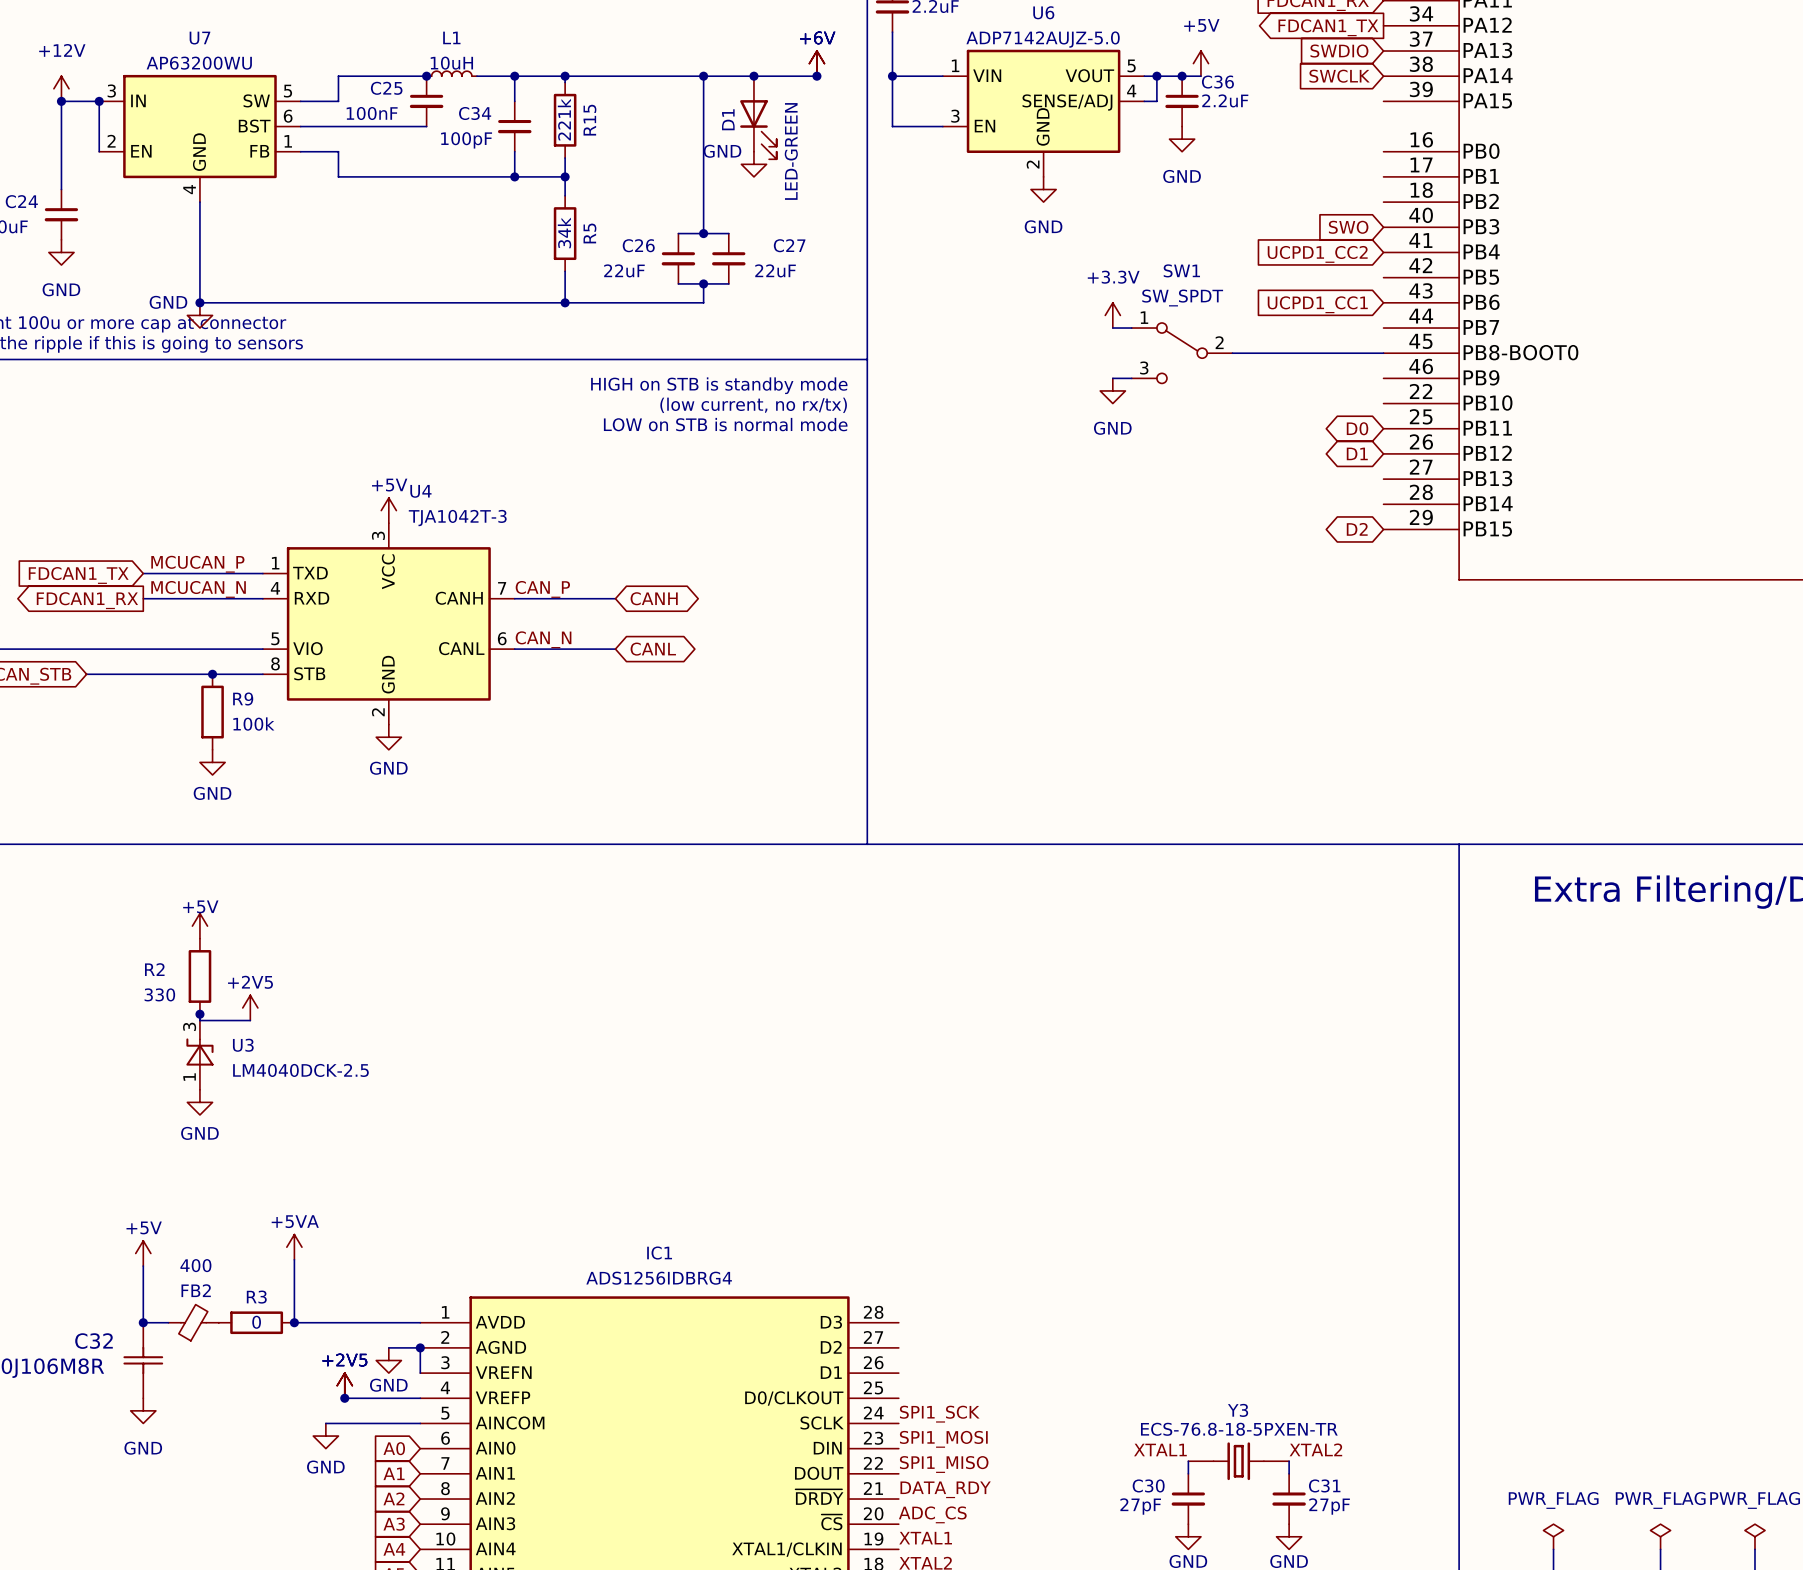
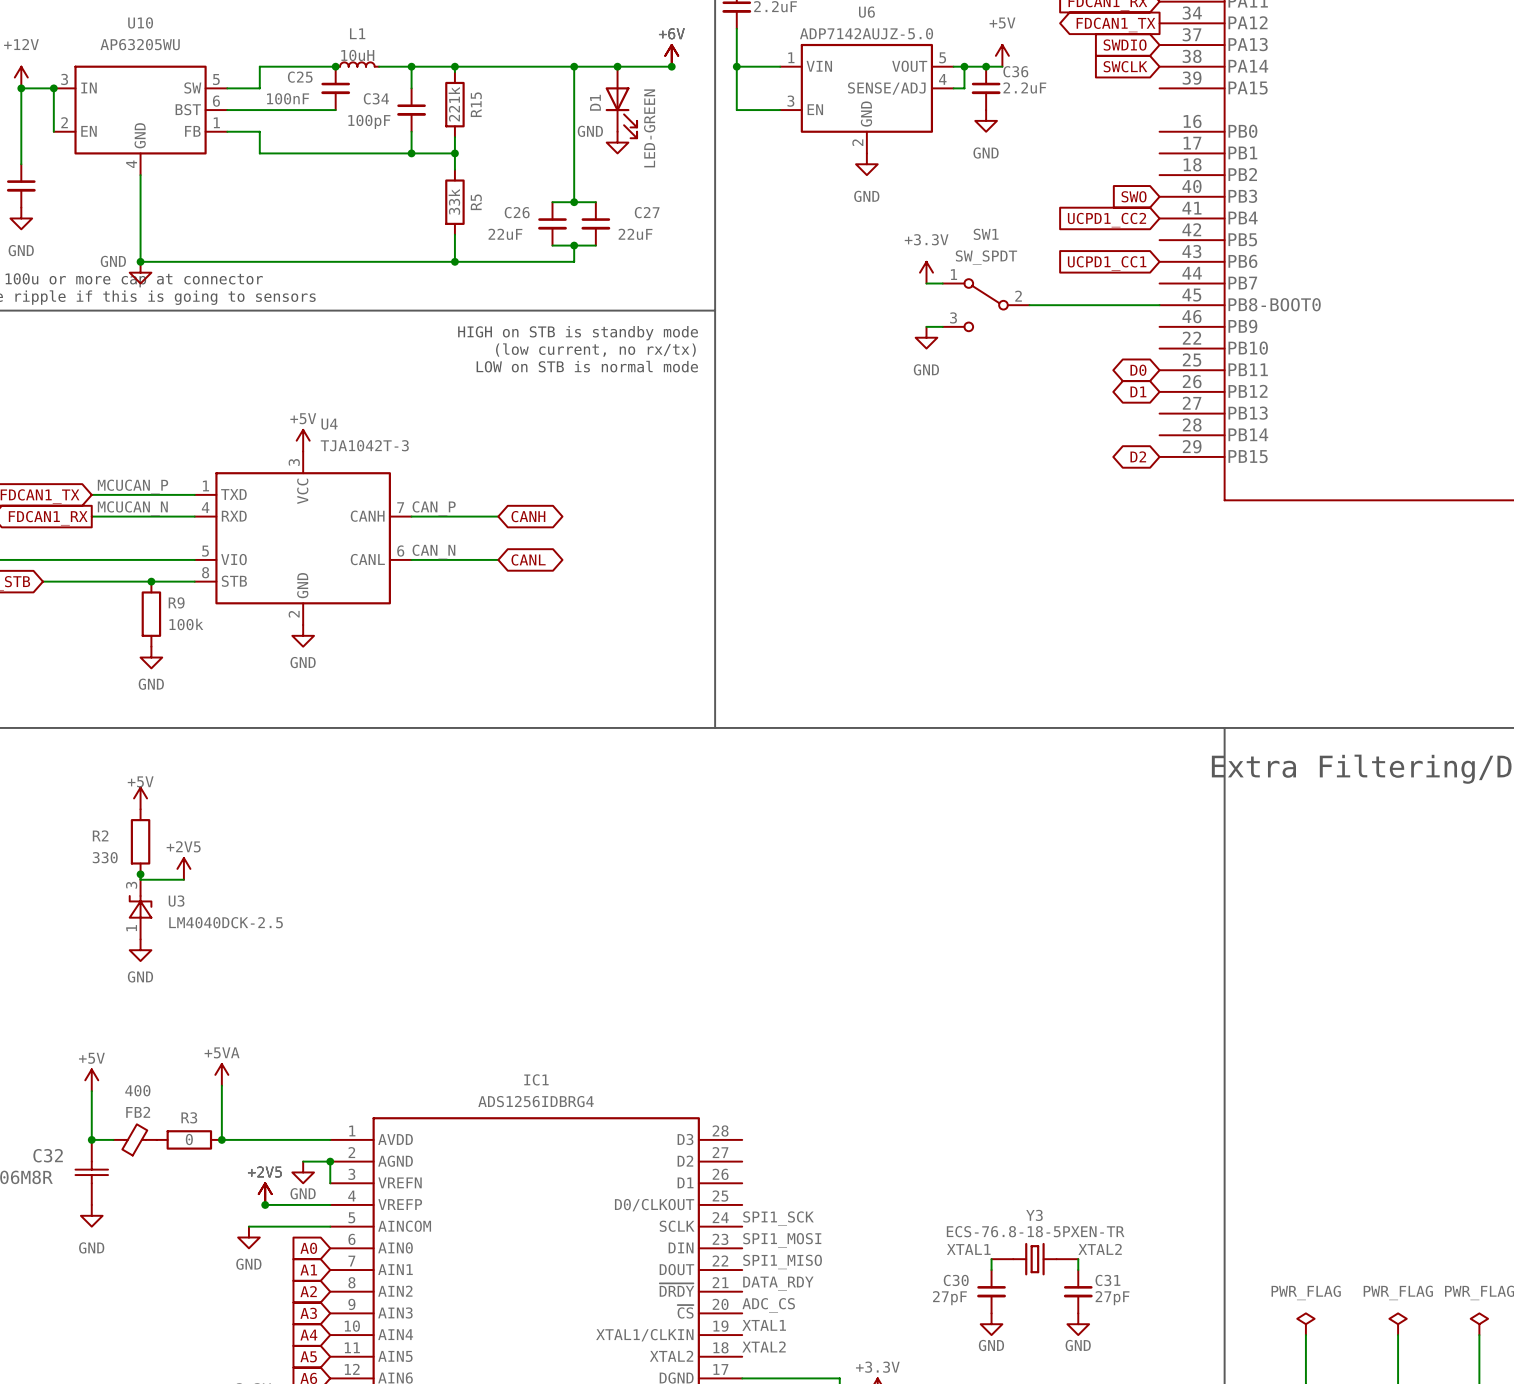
U7 name: U7 (199, 38) -> U10 (140, 22)
U7 value: AP63200WU (199, 63) -> AP63205WU (140, 44)
R5 value: 34k (564, 232) -> 33k (454, 201)

